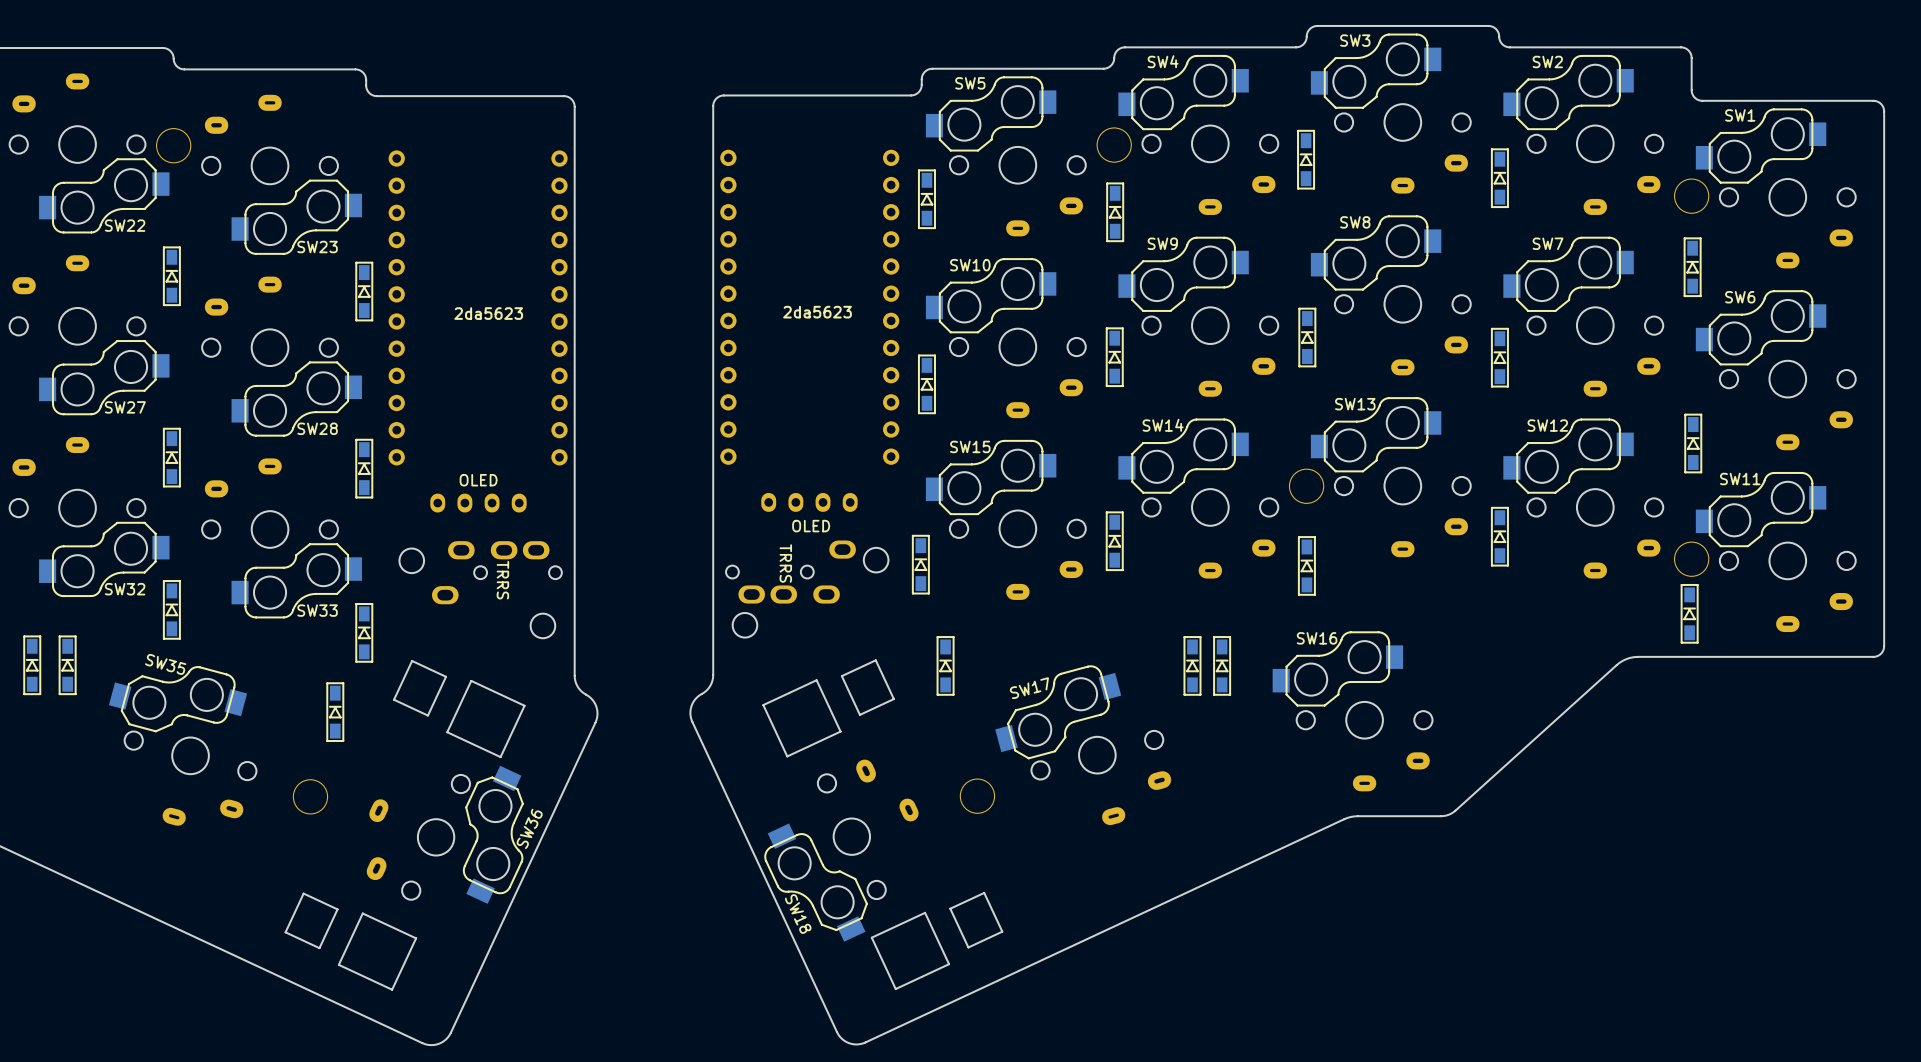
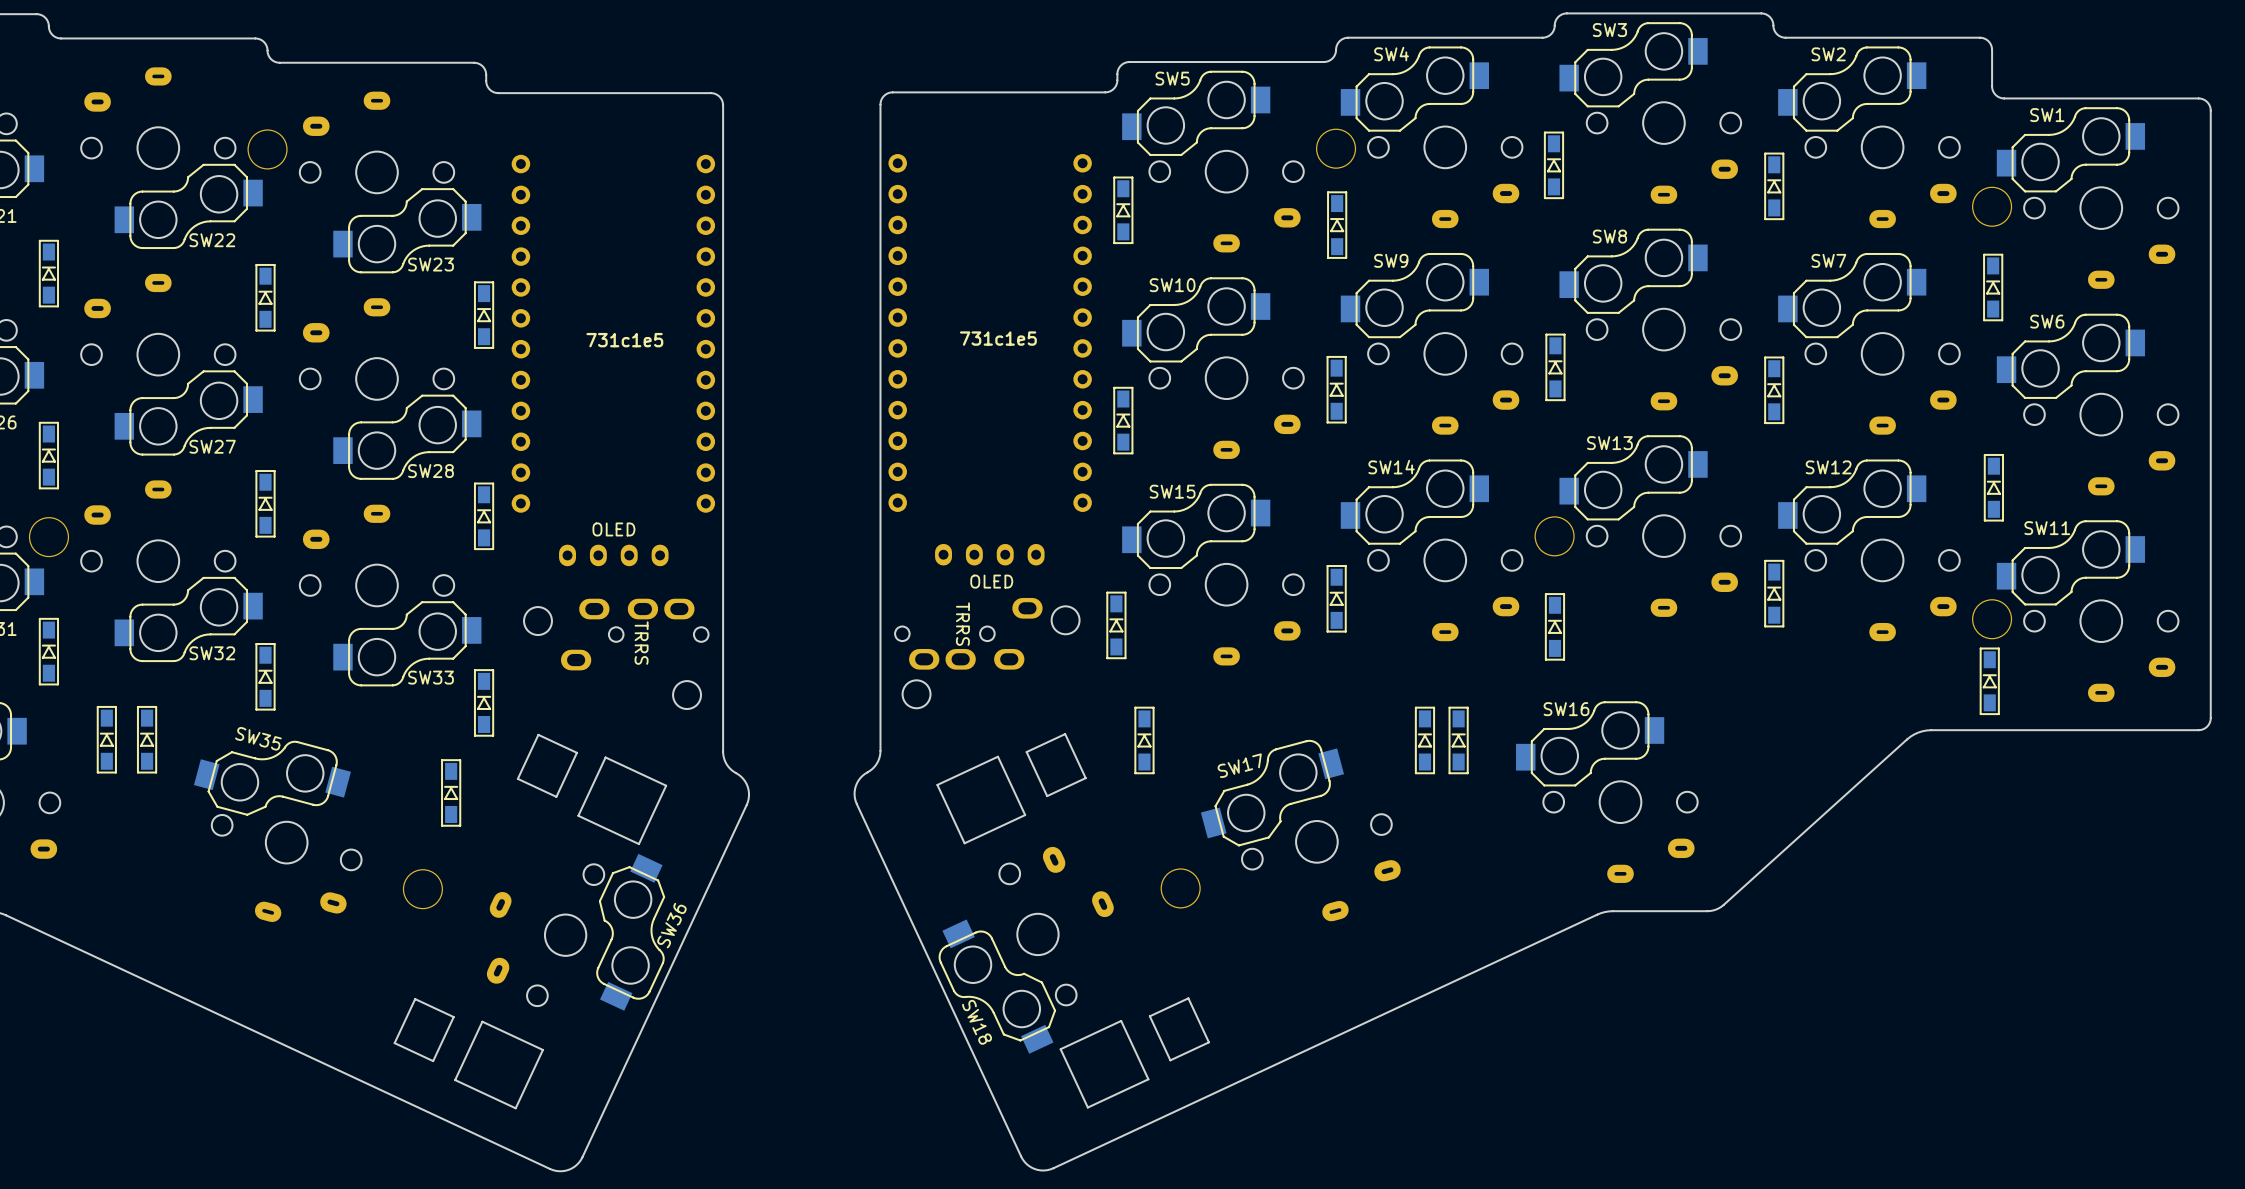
text: 2da5623 (817, 312) -> 731c1e5 (998, 338)
text: 2da5623 (488, 313) -> 731c1e5 (624, 340)

